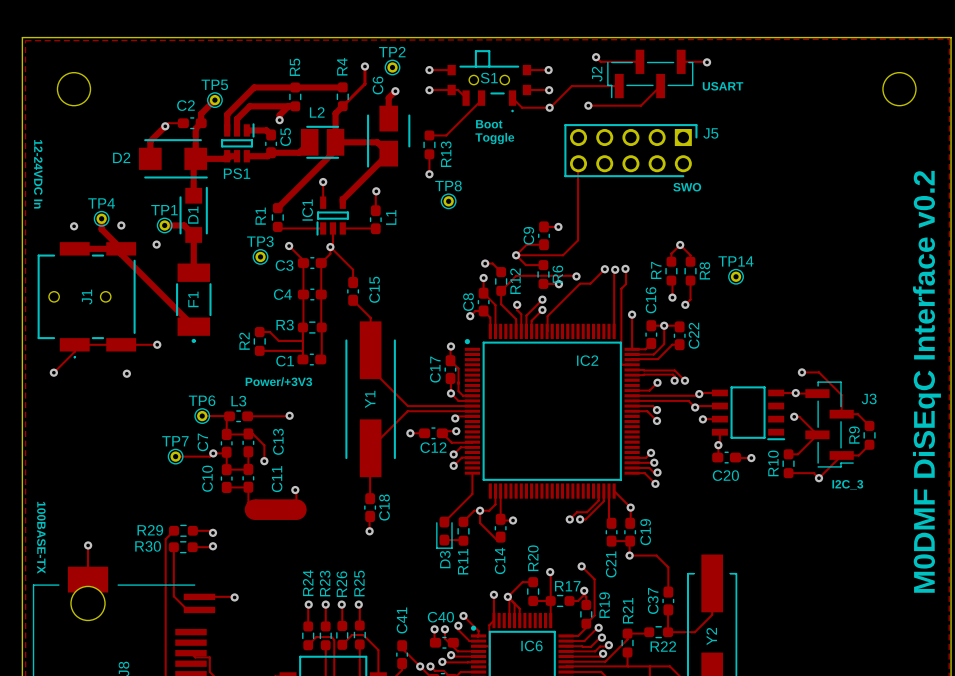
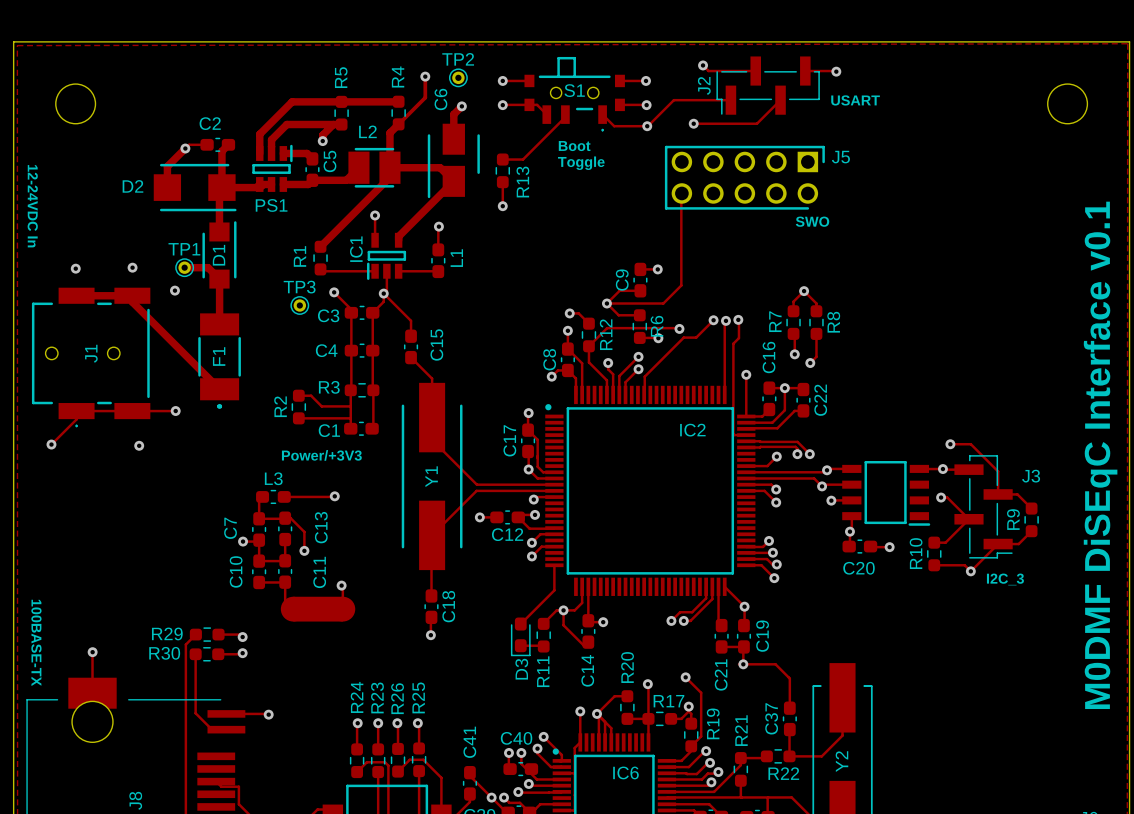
track: (214, 100) (201, 113) (201, 123) -> none
TP5: (214, 100) -> none
TP8: (448, 201) -> none
track: (101, 218) (101, 229) (121, 248) -> none
TP4: (101, 218) -> none
TP14: (736, 276) -> none
text: M0DMF DiSEqC Interface v0.2 (926, 381) -> M0DMF DiSEqC Interface v0.1 (1100, 455)
track: (202, 416) (229, 416) -> none
TP6: (202, 416) -> none
track: (213, 453) (210, 456) (175, 456) -> none
TP7: (175, 456) -> none

